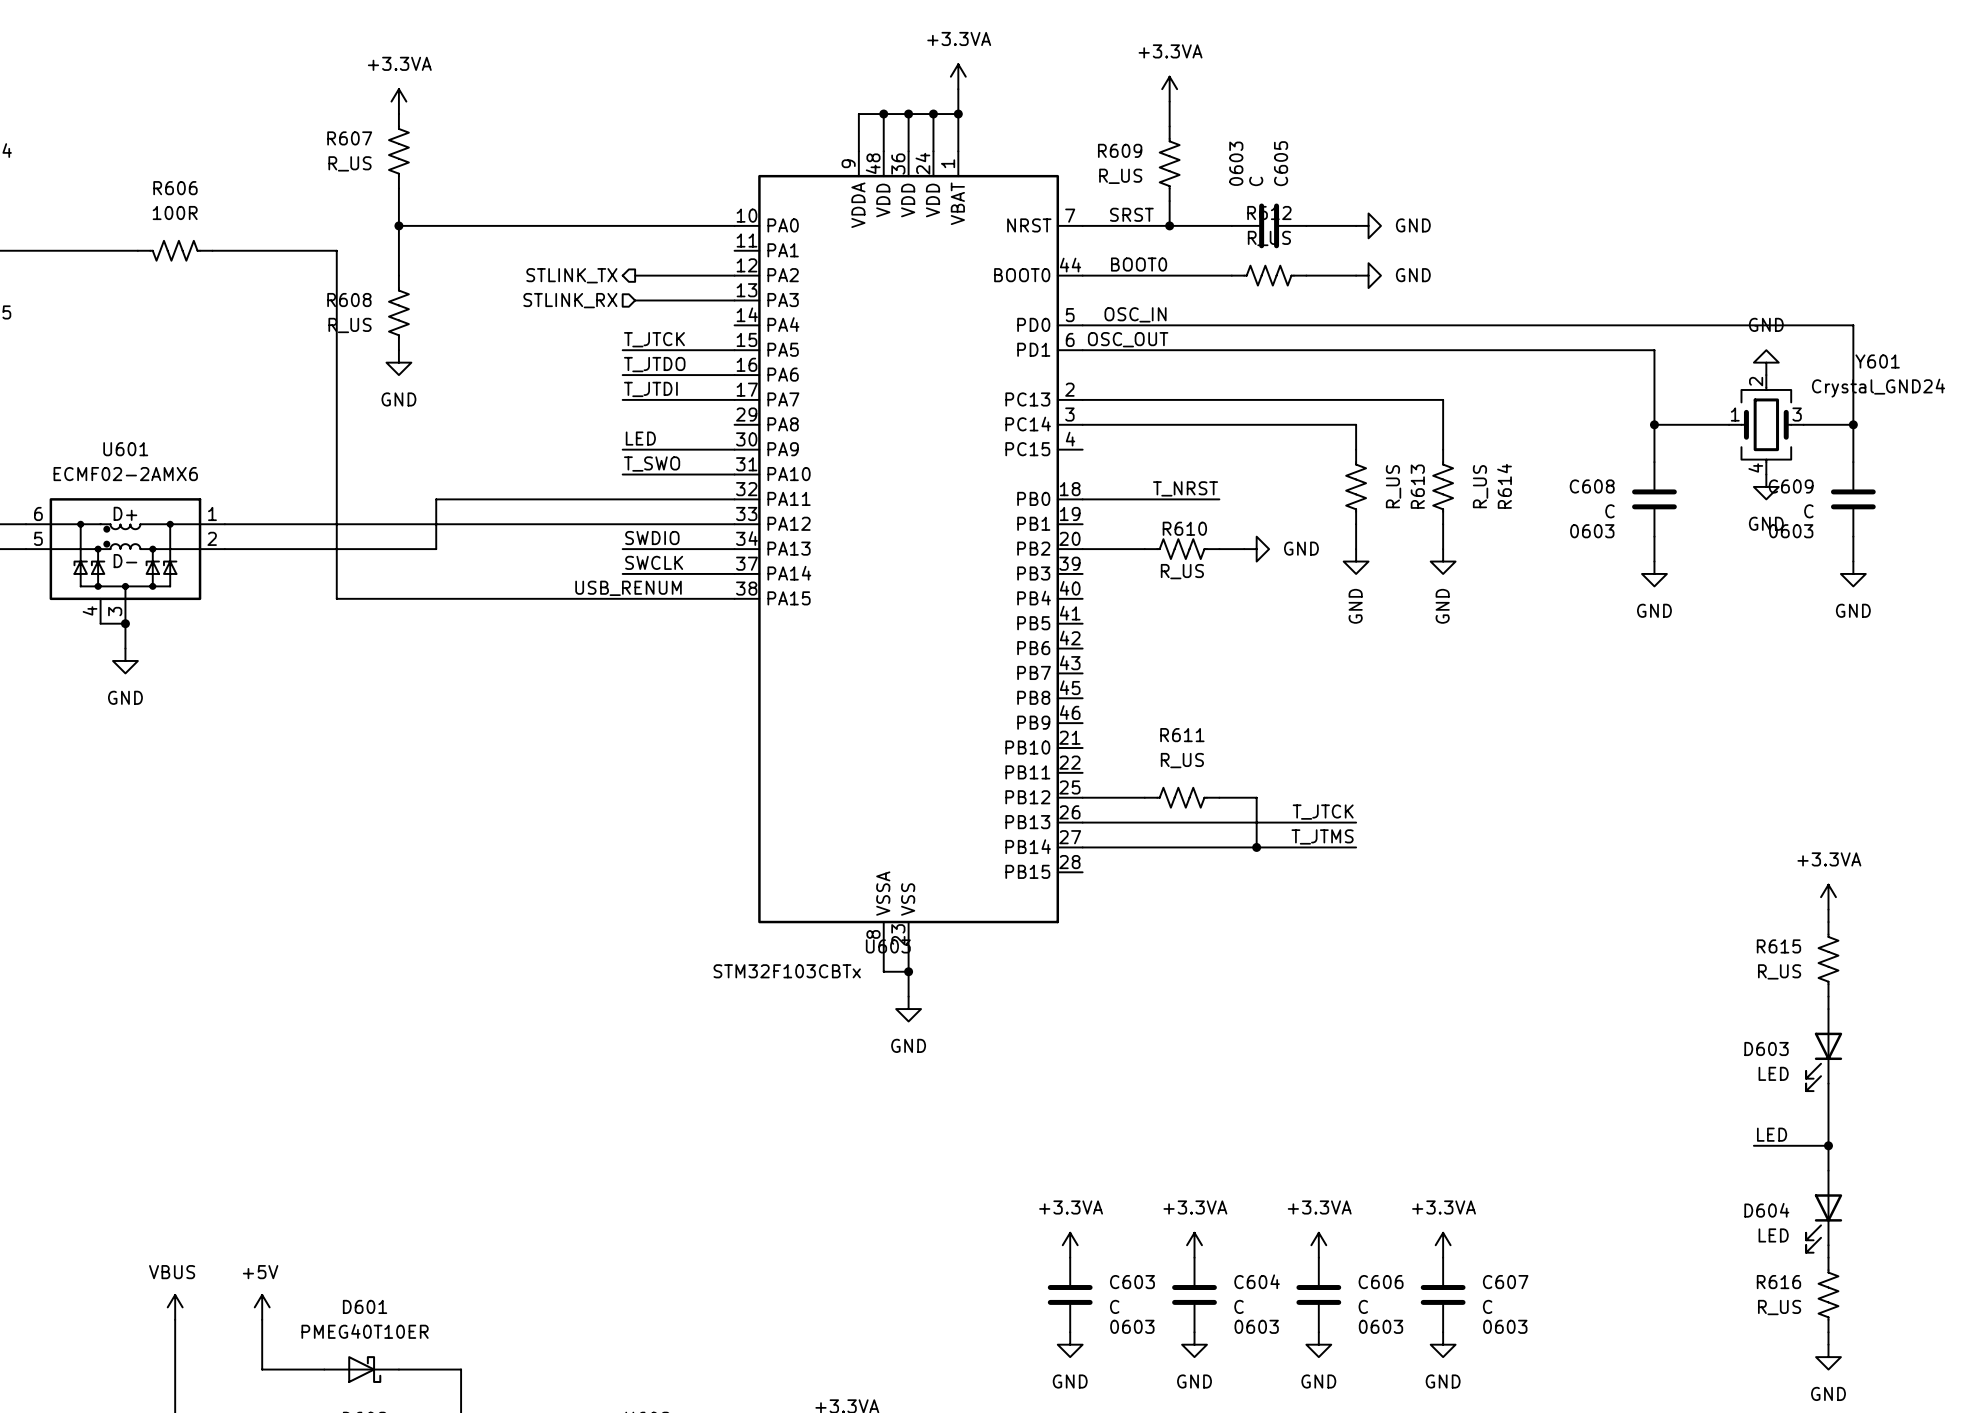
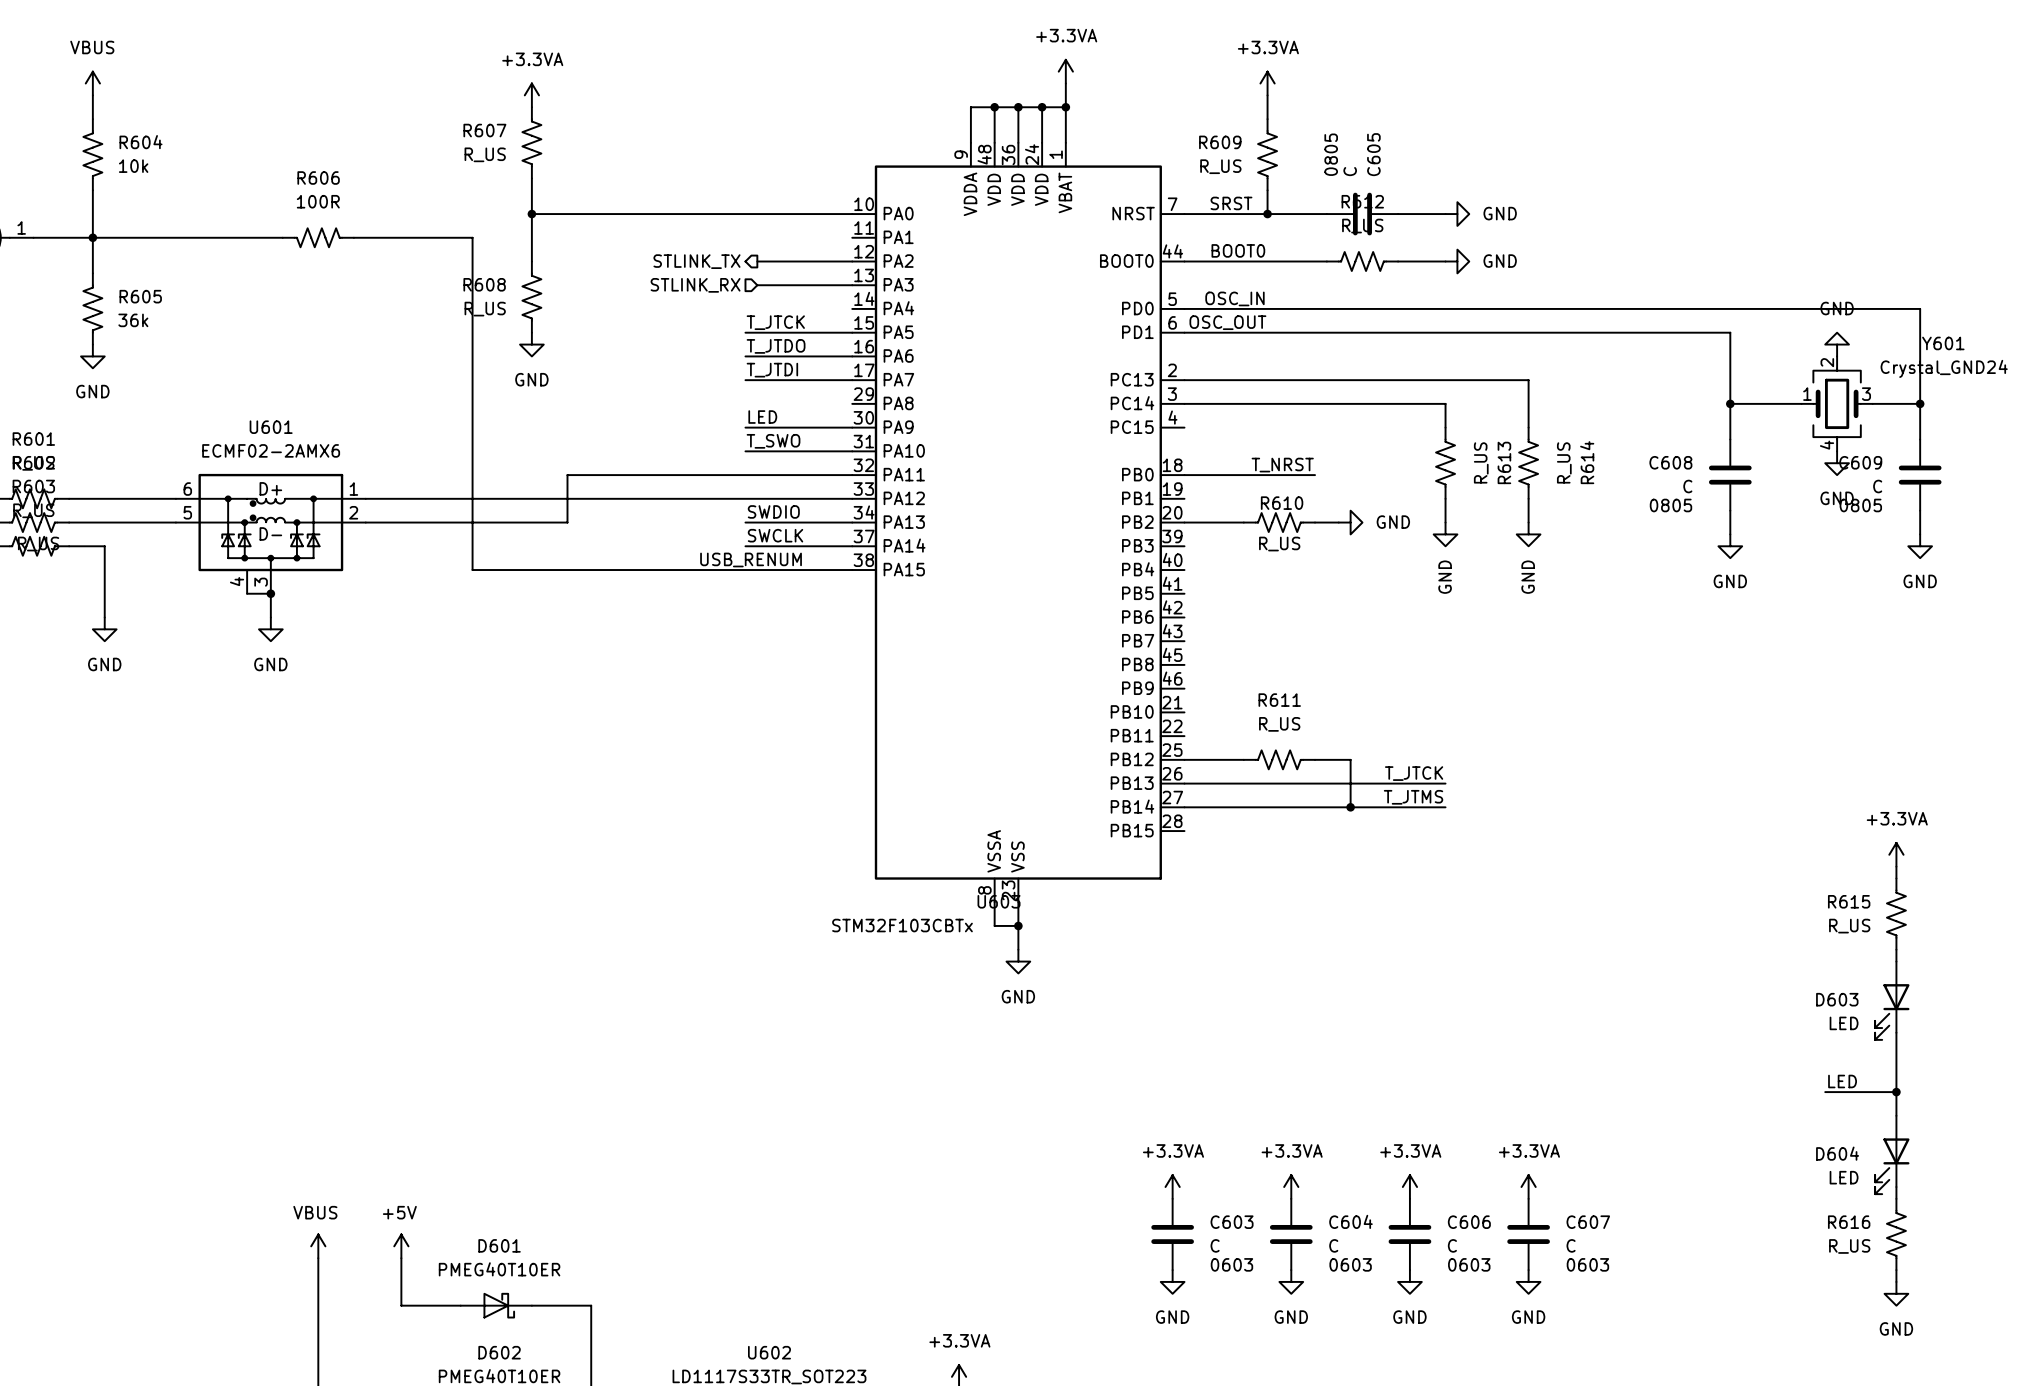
C605 text: 0603 (1236, 163) -> 0805 (1331, 154)
C608 text: 0603 (1592, 531) -> 0805 (1670, 505)
C609 text: 0603 (1791, 531) -> 0805 (1860, 505)

